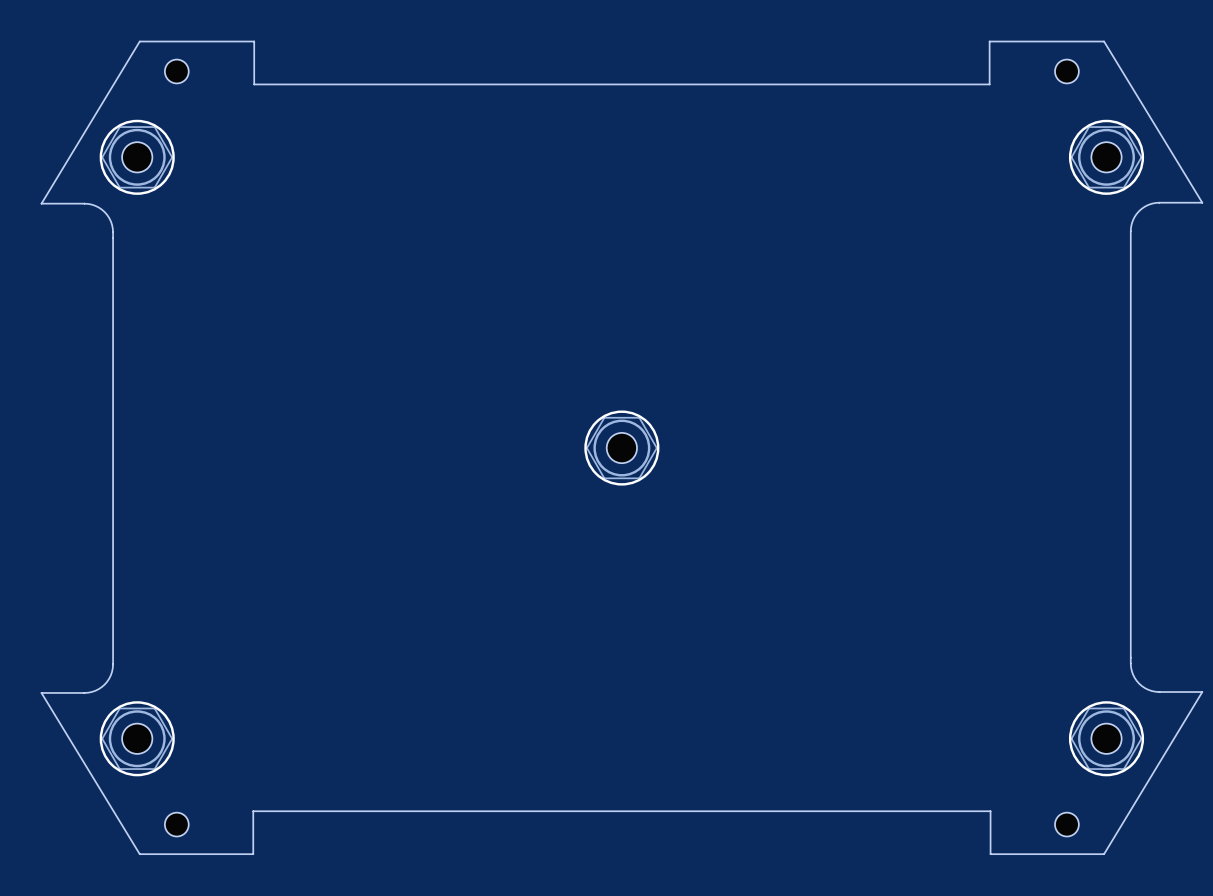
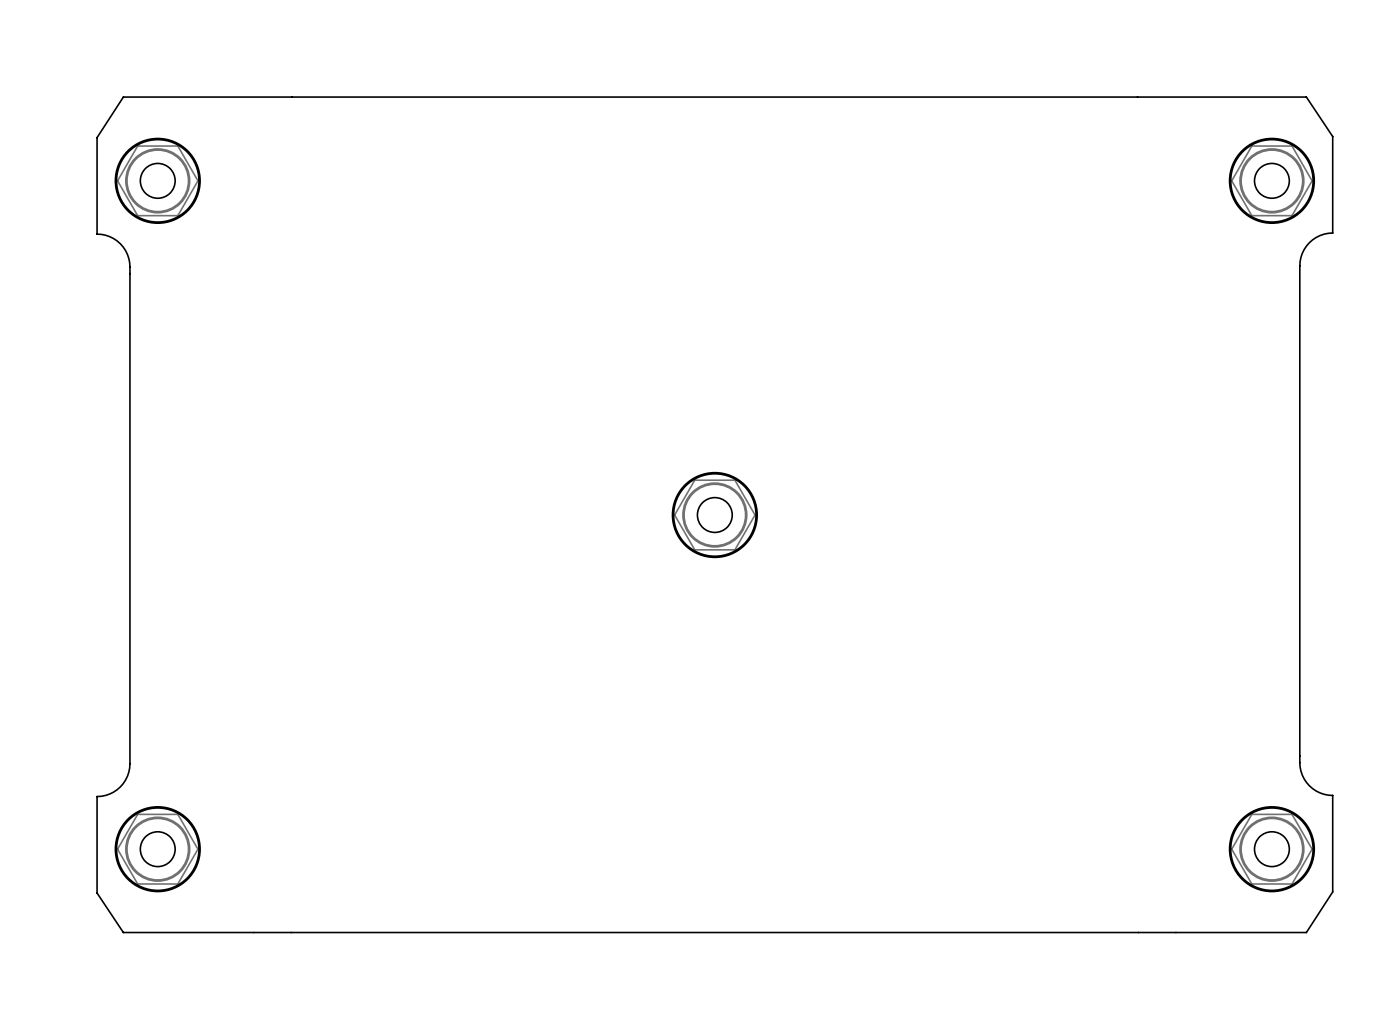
hole: (176, 71) -> none
hole: (1066, 71) -> none
board edge: (254, 84) (254, 41) (139, 41) (41, 203) (84, 203) -> (292, 97) (123, 97) (97, 137) (97, 234)
board edge: (989, 84) (989, 41) (1104, 41) (1202, 202) (1159, 202) -> (1137, 97) (1306, 97) (1332, 136) (1332, 233)
board edge: (84, 692) (41, 692) (139, 854) (253, 854) (253, 811) -> (97, 796) (97, 893) (123, 932) (291, 932)
board edge: (1159, 692) (1202, 692) (1104, 854) (990, 854) (990, 811) -> (1332, 795) (1332, 891) (1306, 932) (1138, 932)
hole: (176, 824) -> none
hole: (1066, 824) -> none

